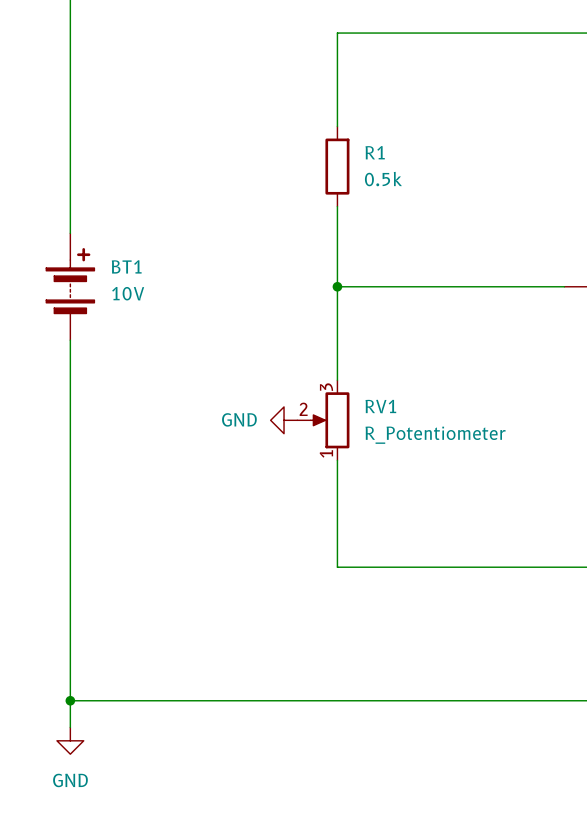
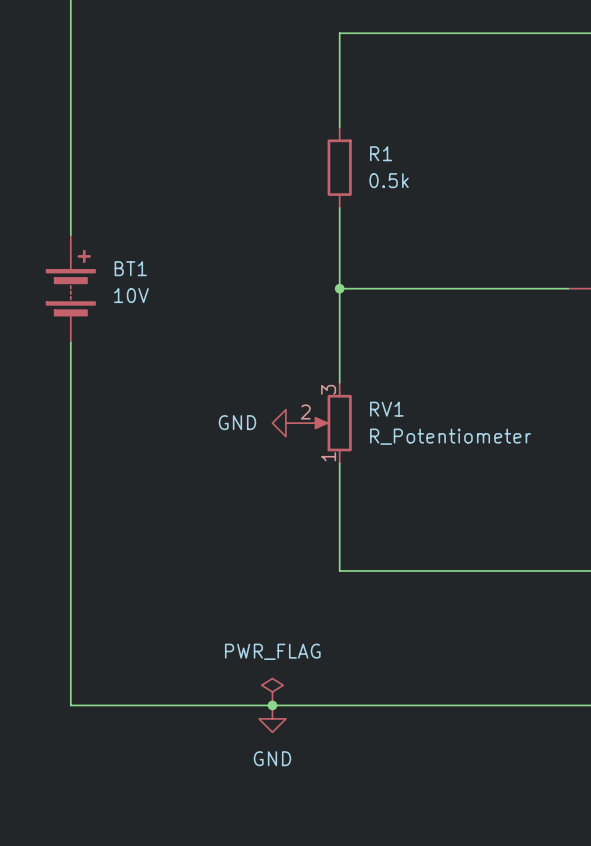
power symbol: none -> PWR_FLAG (272, 691)
wire: (70, 700) (70, 727) -> none
junction: (70, 700) -> none
junction: none -> (272, 705)
power symbol position: GND (70, 740) -> GND (272, 718)

